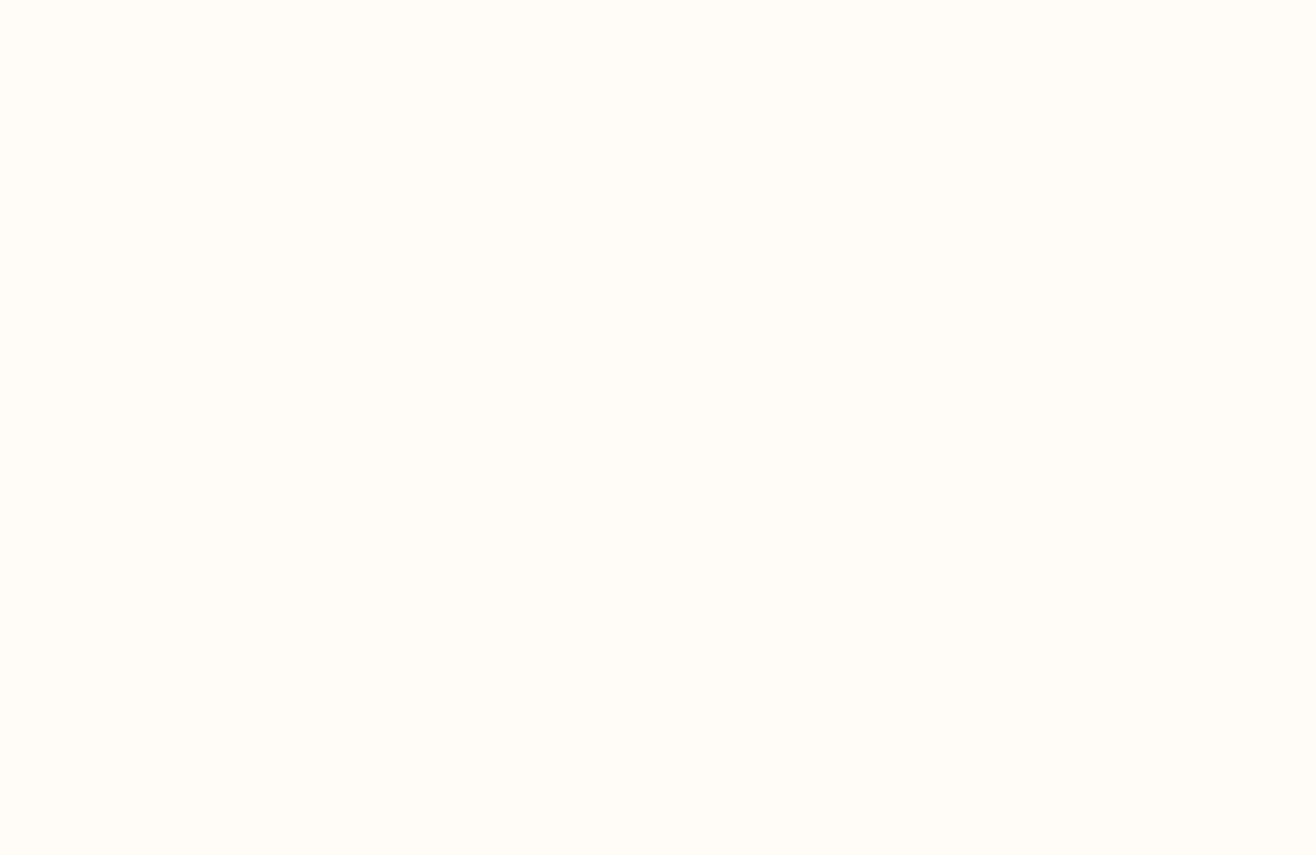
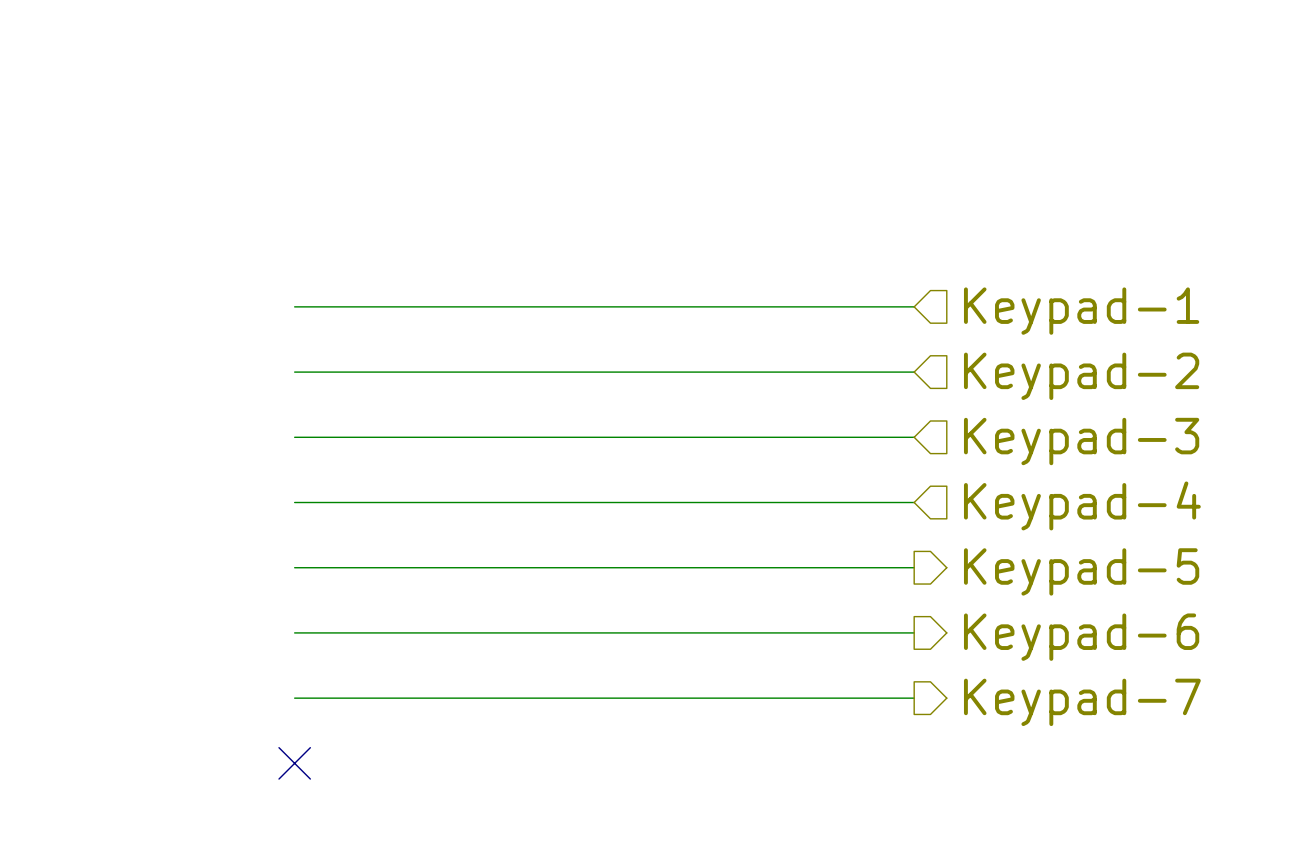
wire: none -> (294, 306) (914, 306)
hierarchical label: none -> Keypad-1 (1081, 311)
wire: none -> (294, 372) (914, 372)
hierarchical label: none -> Keypad-2 (1081, 376)
wire: none -> (294, 437) (914, 437)
hierarchical label: none -> Keypad-3 (1081, 441)
wire: none -> (294, 502) (914, 502)
hierarchical label: none -> Keypad-4 (1082, 505)
wire: none -> (294, 567) (914, 567)
hierarchical label: none -> Keypad-5 (1081, 571)
wire: none -> (294, 632) (914, 632)
hierarchical label: none -> Keypad-6 (1081, 637)
wire: none -> (294, 698) (914, 698)
hierarchical label: none -> Keypad-7 (1082, 702)
no-connect mark: none -> (294, 763)

